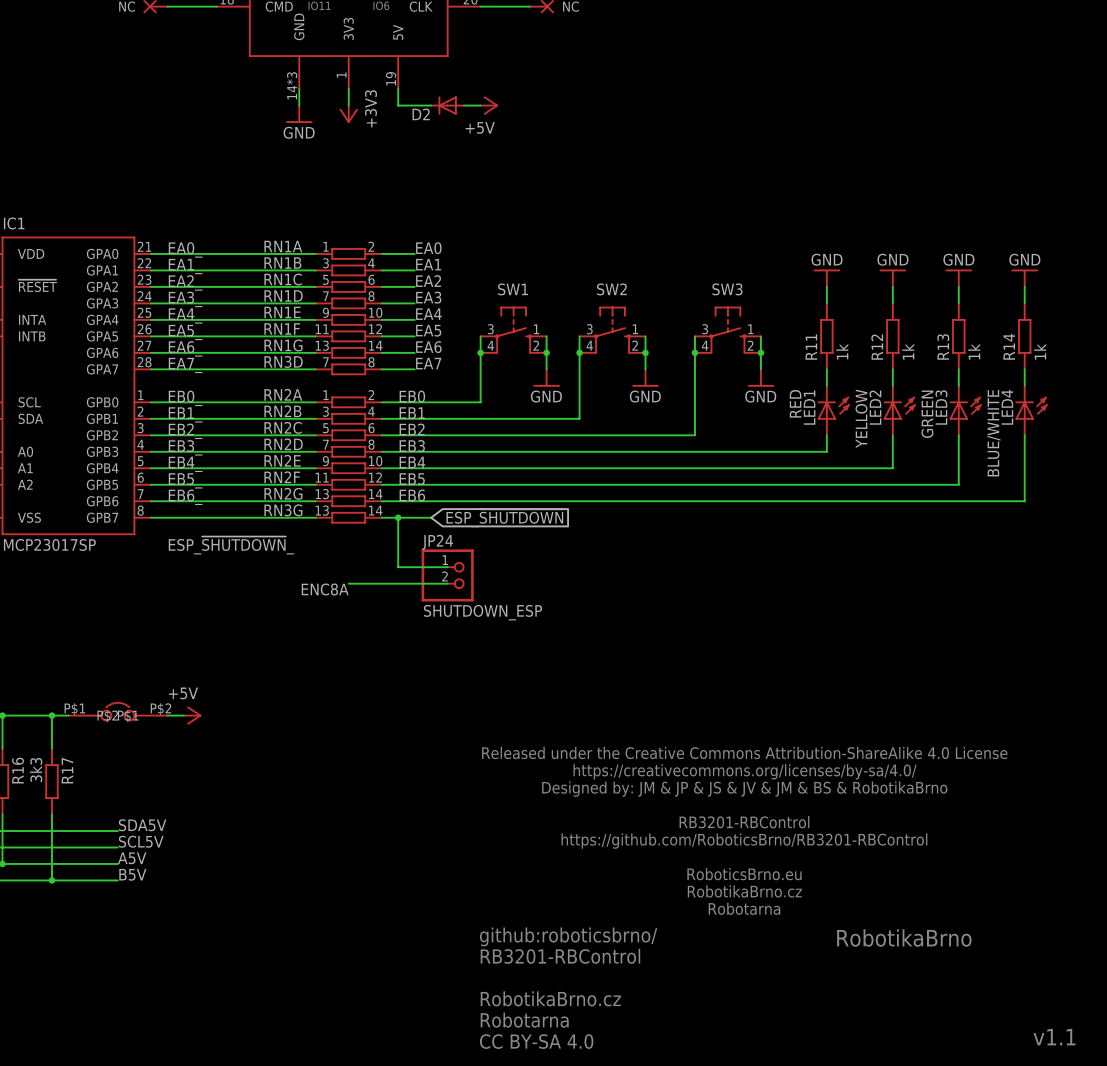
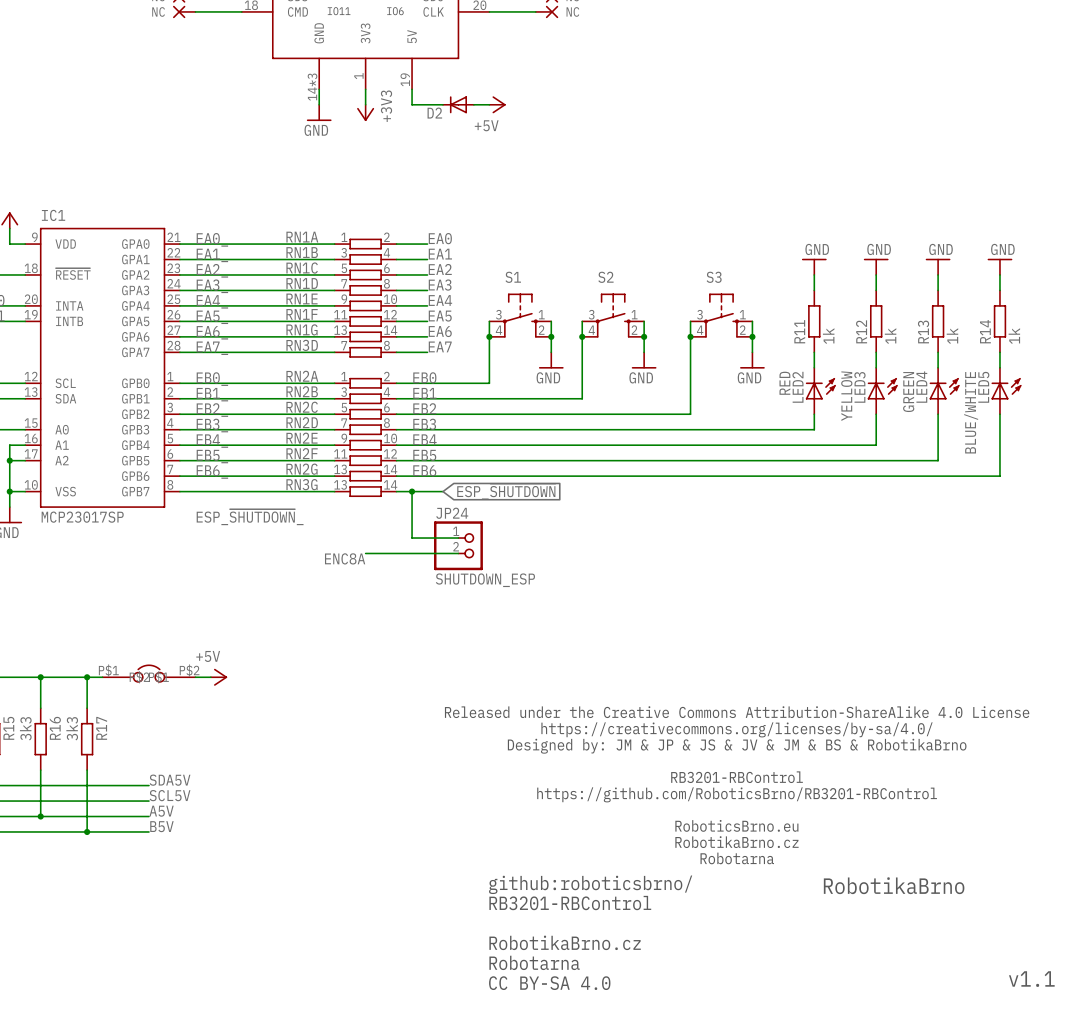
SW1 name: SW1 (513, 289) -> S1 (513, 277)
SW2 name: SW2 (611, 289) -> S2 (605, 277)
SW3 name: SW3 (727, 289) -> S3 (714, 277)
LED1 name: LED1 (809, 407) -> LED2 (797, 387)
LED2 name: LED2 (875, 407) -> LED3 (859, 387)
LED3 name: LED3 (941, 407) -> LED4 (921, 387)
LED4 name: LED4 (1007, 407) -> LED5 (983, 387)

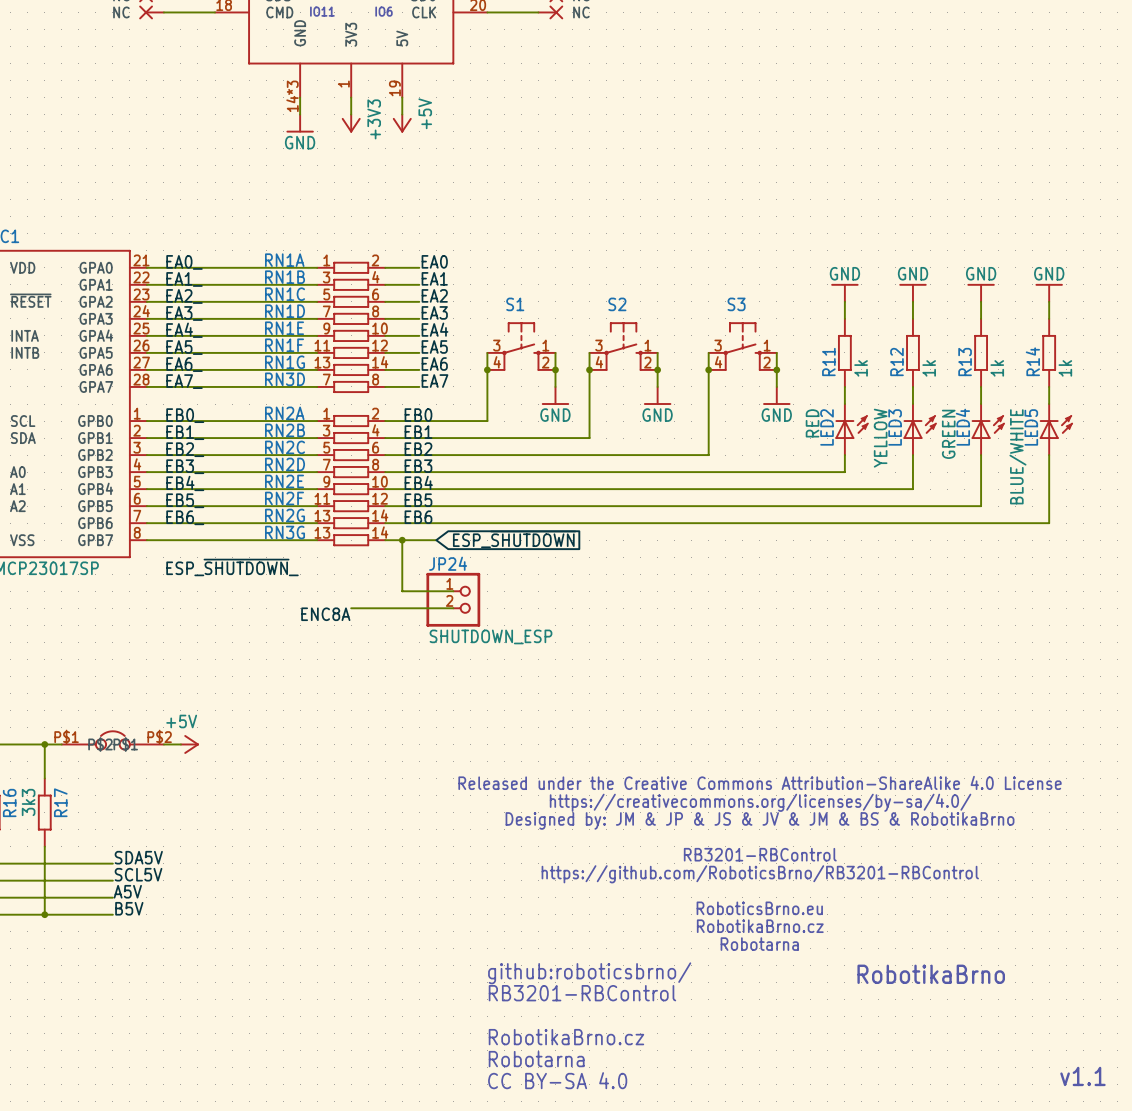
wire: (412, 104) (442, 104) -> none
D2: (458, 104) -> none
wire: (473, 104) (489, 104) -> none
power symbol position: +5V (497, 104) -> +5V (402, 123)
power symbol rotation: 0° (499, 104) -> 90° clockwise (402, 125)
power symbol text position: +5V (486, 125) -> +5V (425, 113)

